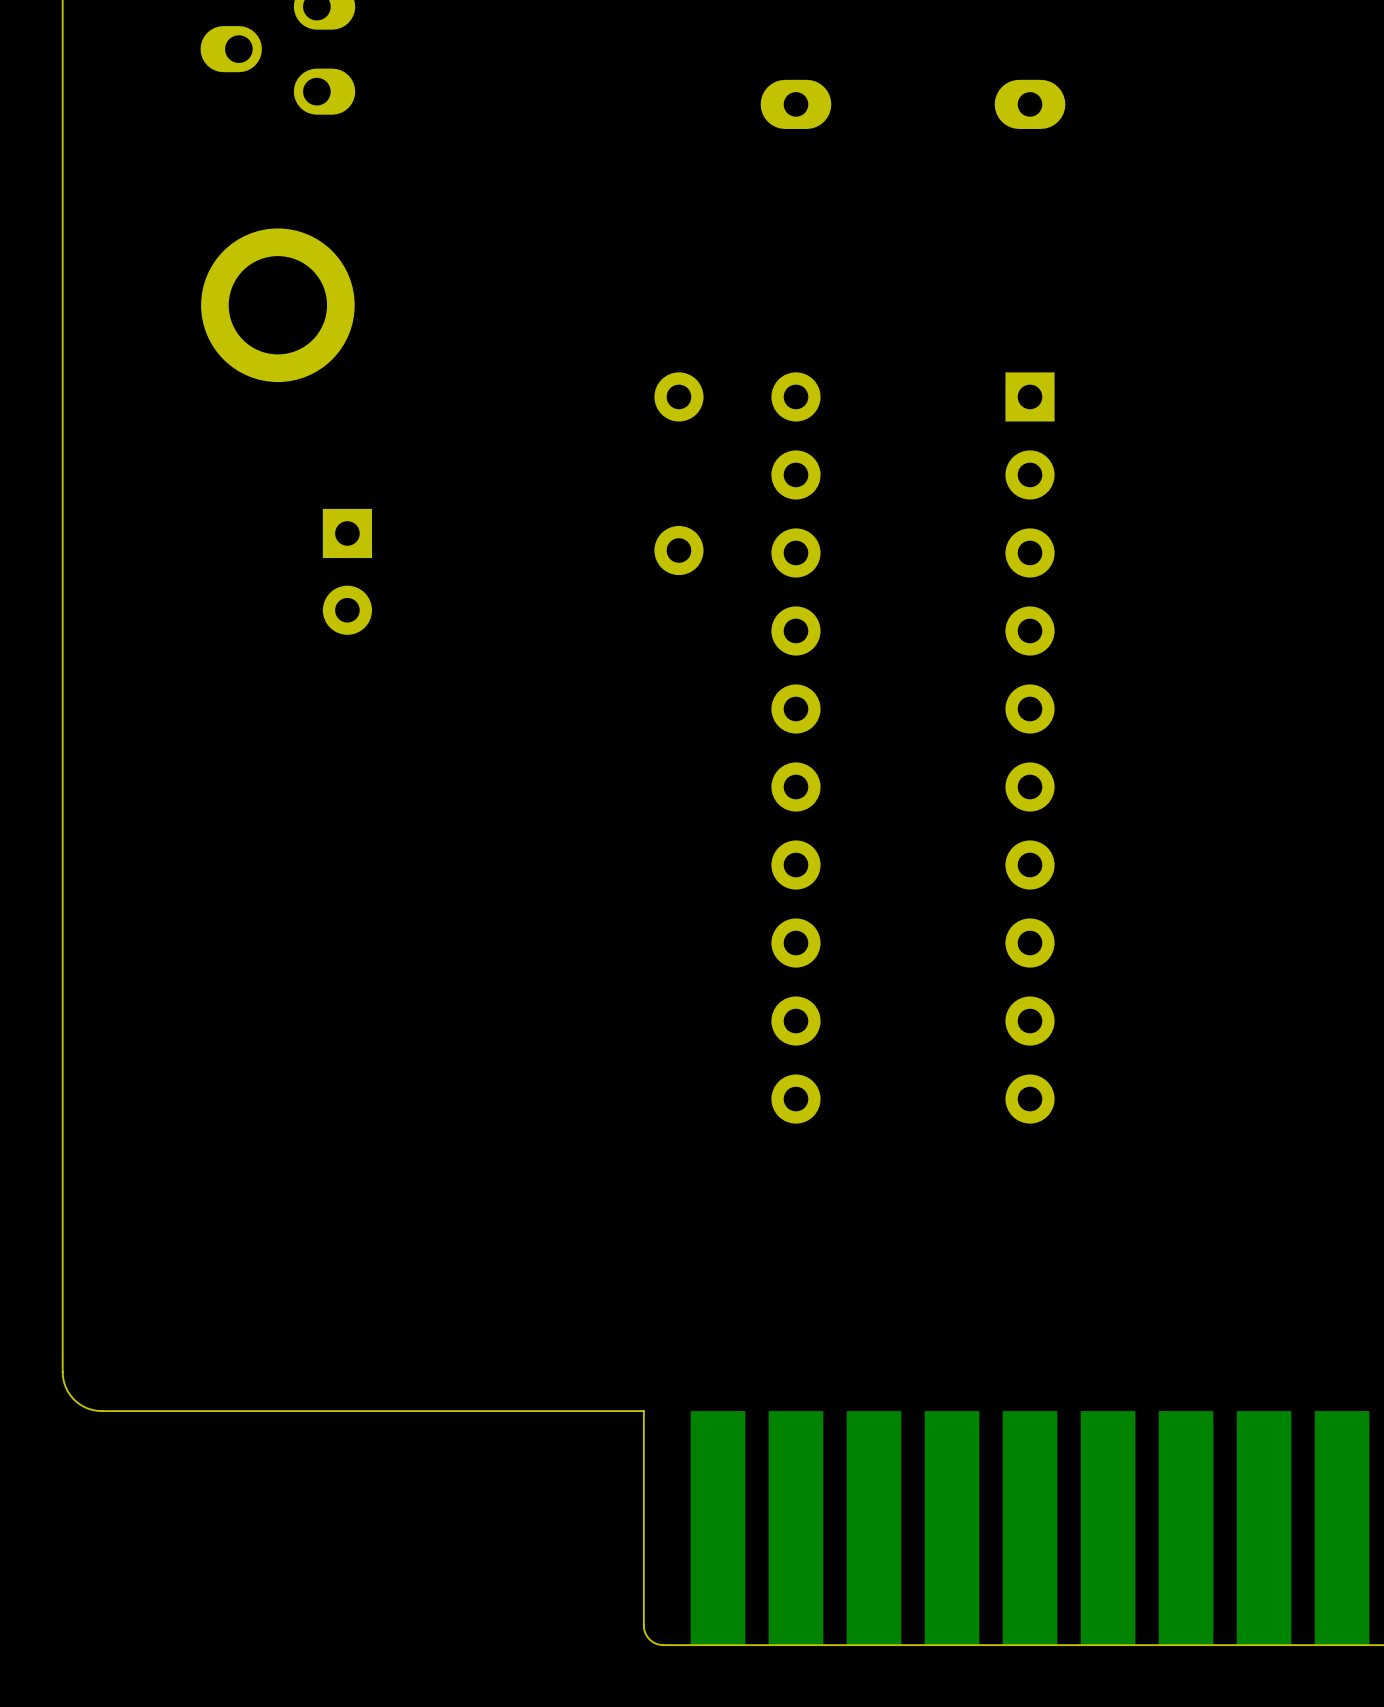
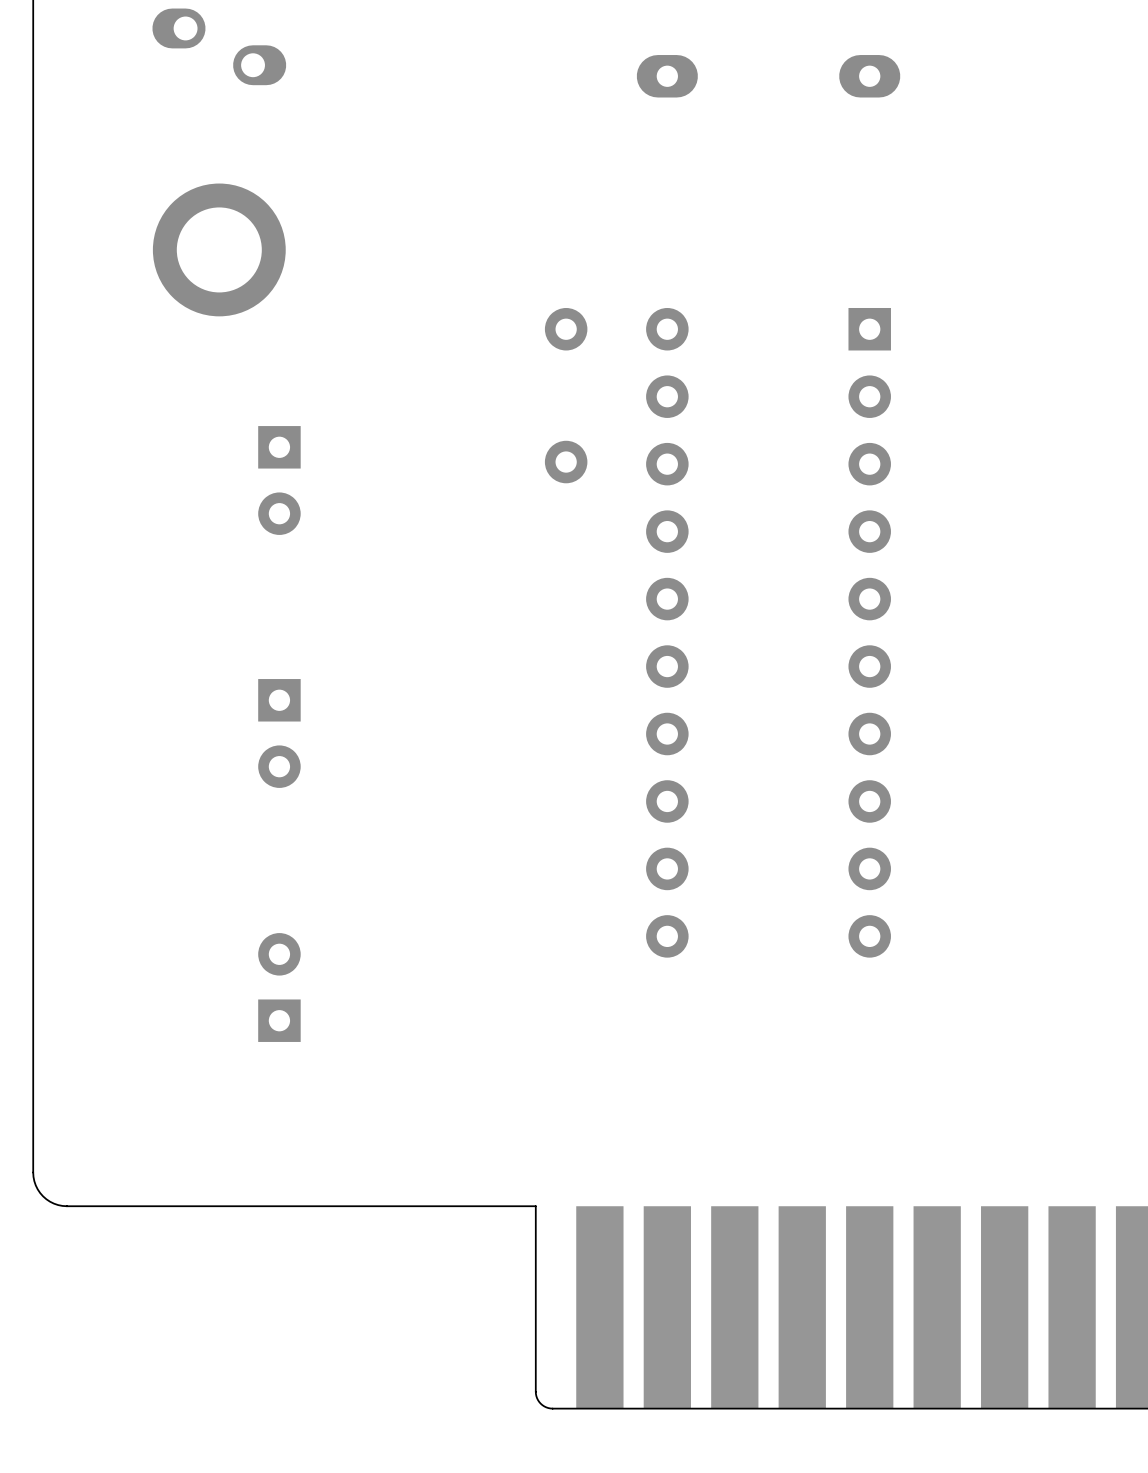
part: none -> (279, 733)
part: none -> (279, 987)

